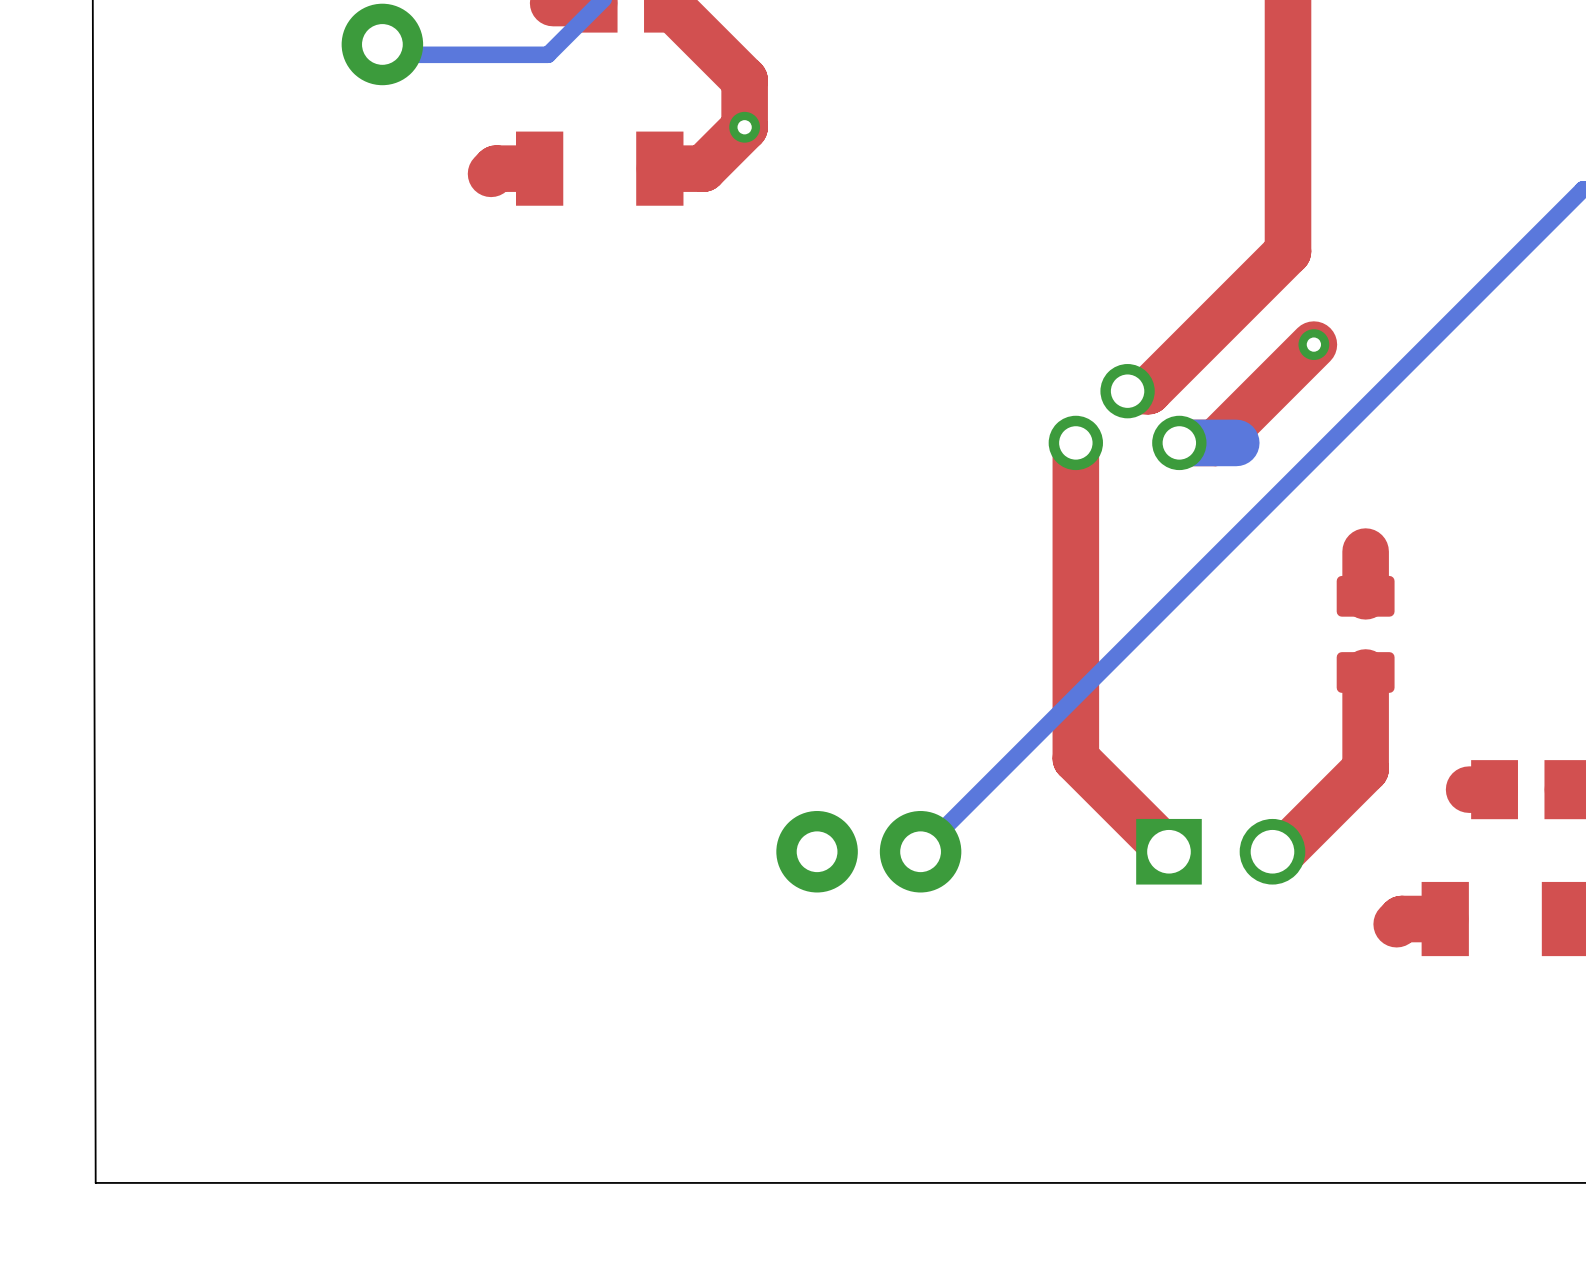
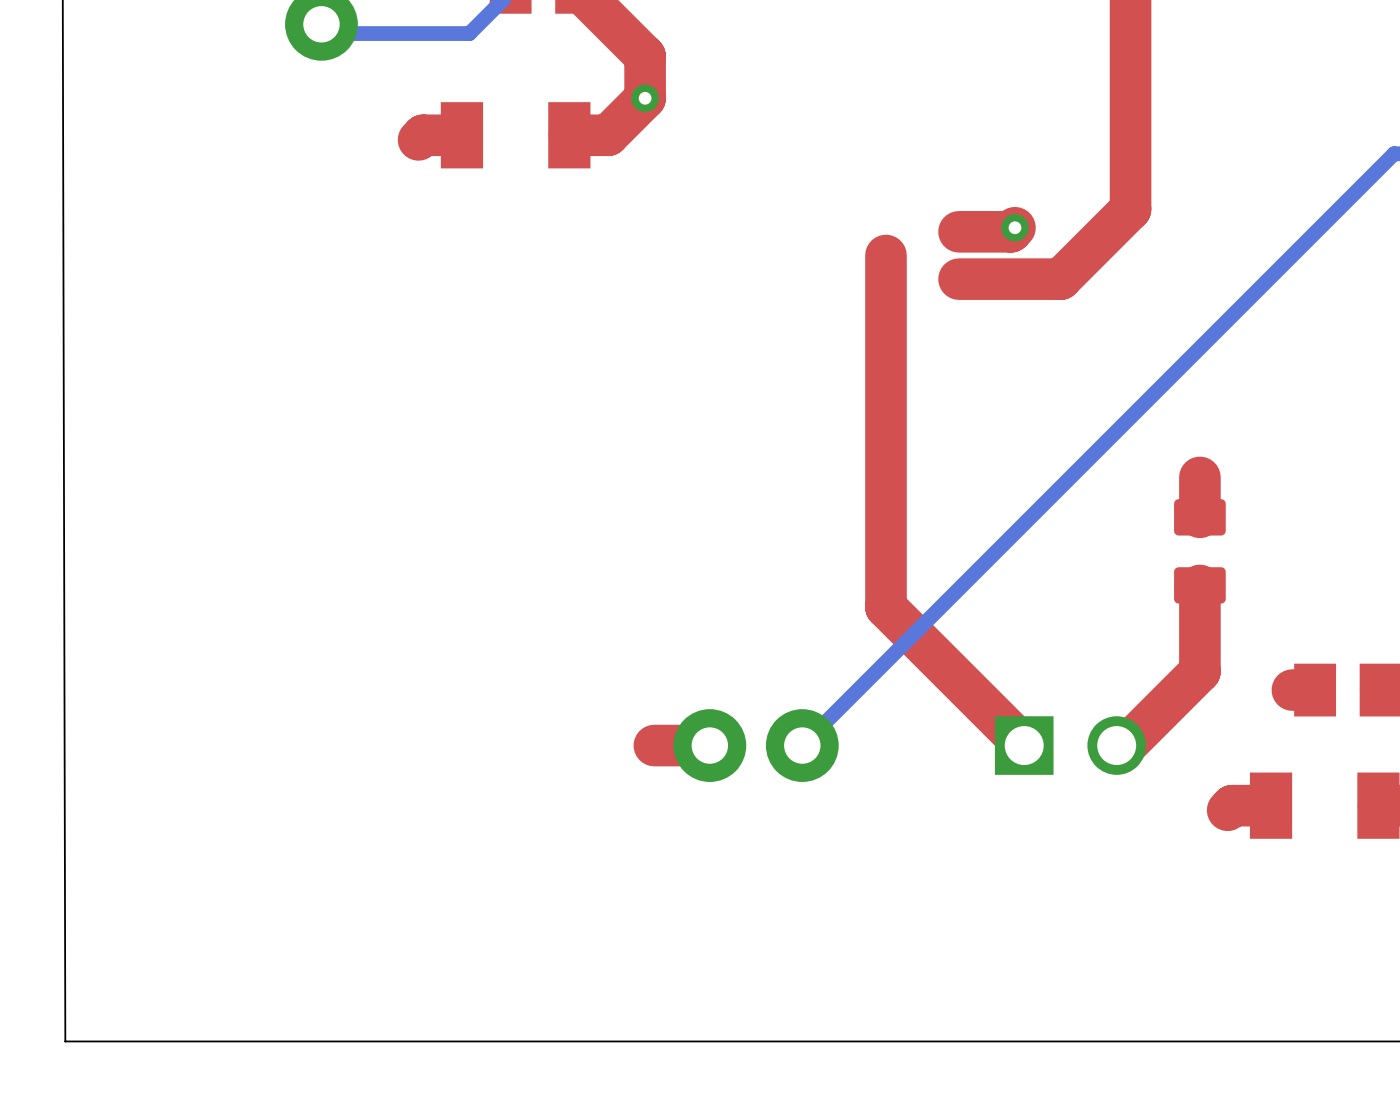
top track: none -> (1014, 227) (1010, 231) (959, 231)
top track: (1209, 329) (1148, 391) (1127, 391) -> (1060, 279) (959, 279)
top track: (1313, 344) (1215, 442) (1179, 442) -> none
via position: (1313, 344) -> (1014, 227)
part: (1127, 417) -> none
top track: (1075, 442) (1075, 758) -> (885, 255) (885, 607) (941, 662)
bottom track: (1236, 442) (1179, 442) -> none
top track: none -> (709, 745) (654, 745)

